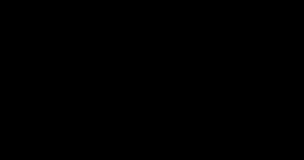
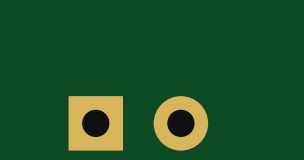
part: none -> (138, 123)

